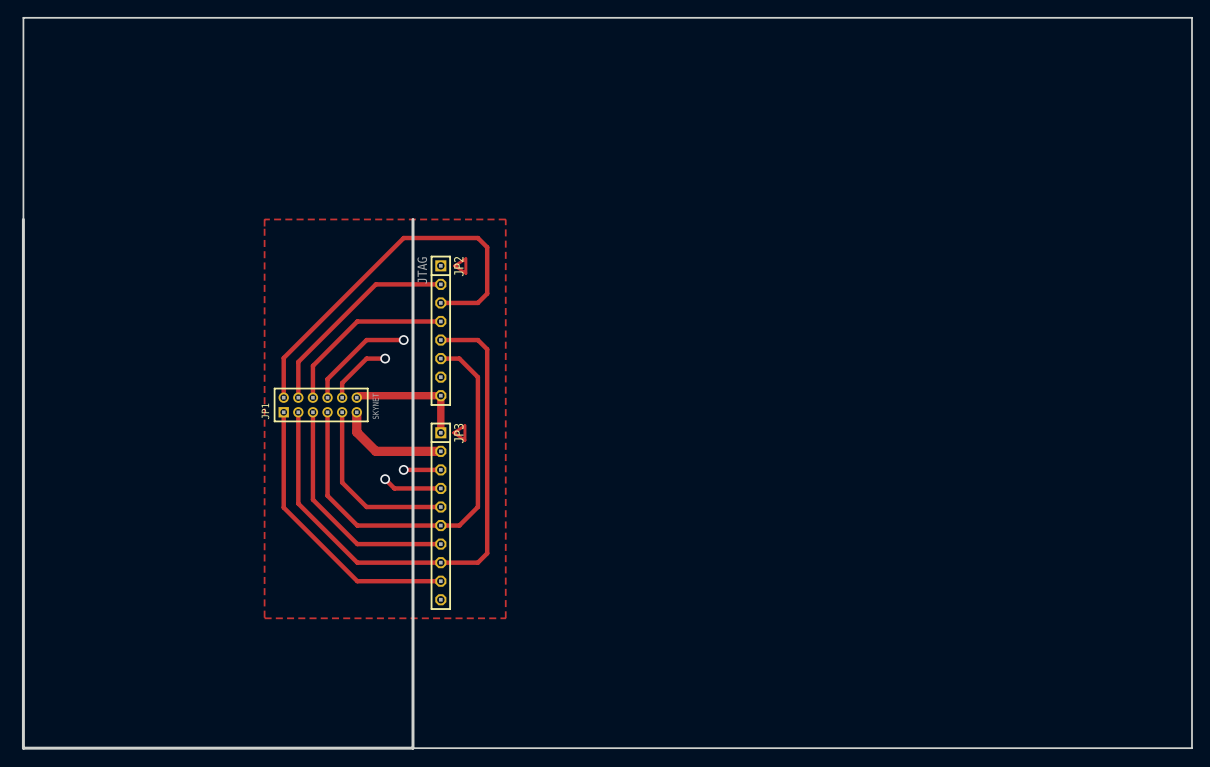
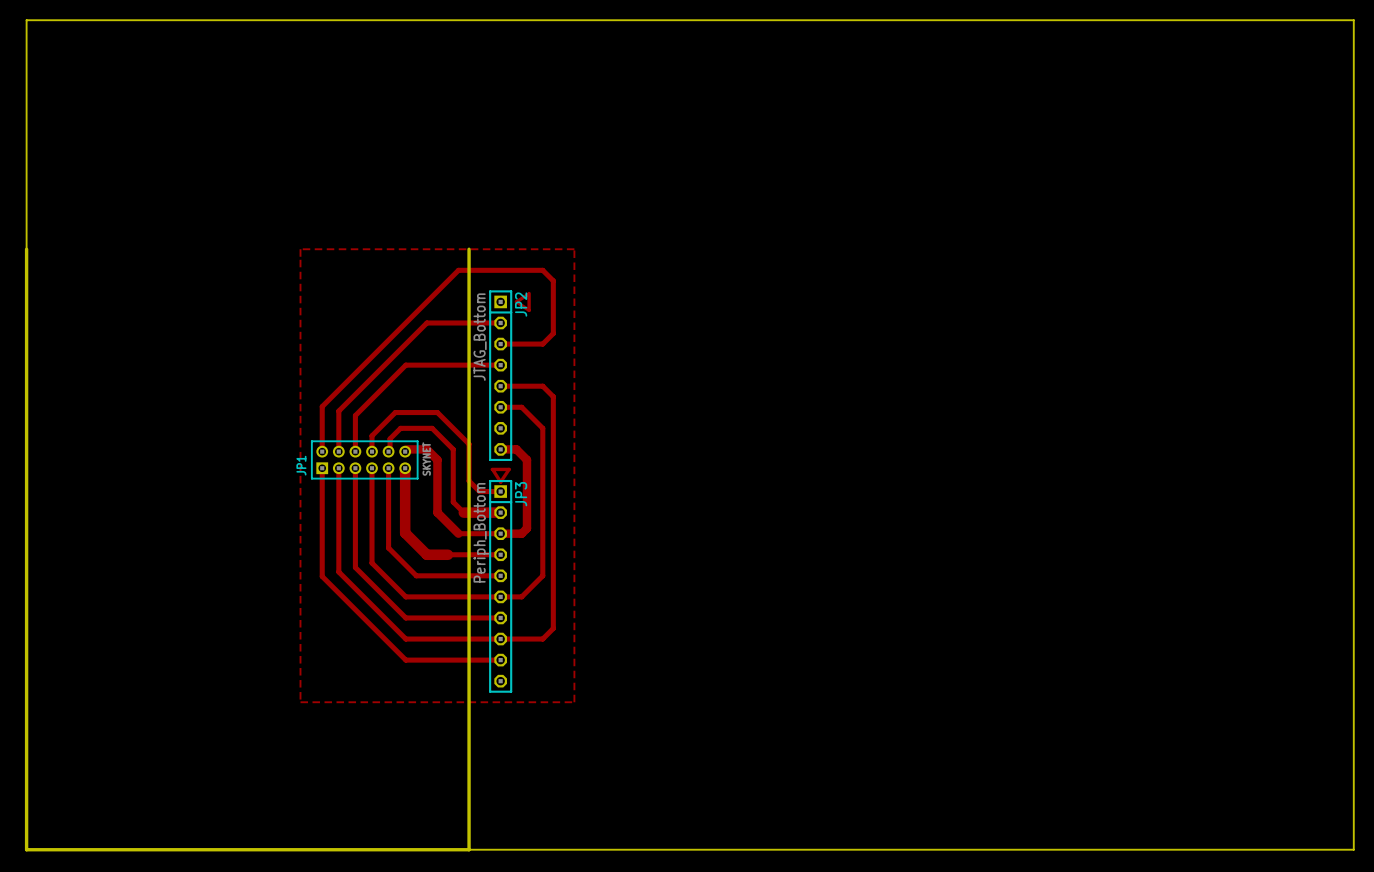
JP2 value: JTAG (422, 270) -> JTAG_Bottom (480, 337)
track: (403, 340) (366, 340) (327, 379) (327, 383) -> none
via: (403, 340) -> none
track: (385, 358) (366, 358) (342, 383) (342, 397) -> none
via: (385, 358) -> none
track: (375, 395) (440, 395) (440, 432) -> (372, 435) (395, 412) (437, 412) (469, 444) (469, 481) (479, 491) (500, 491)
track: none -> (426, 449) (437, 459) (437, 512) (458, 533)
track: none -> (500, 449) (516, 449) (526, 459) (526, 528) (521, 533) (500, 533)
track: none -> (492, 469) (509, 469) (500, 482) (493, 470)
track: (464, 425) (464, 440) (453, 432) (464, 426) -> none
track: (356, 432) (375, 451) (408, 451) -> (388, 451) (390, 438) (400, 428) (432, 428) (453, 449) (453, 502) (463, 512)
JP3 value: none -> Periph_Bottom (481, 532)
via: (403, 469) -> none
track: (385, 479) (394, 488) -> (405, 490) (405, 533) (426, 554) (447, 554)
via: (385, 479) -> none

